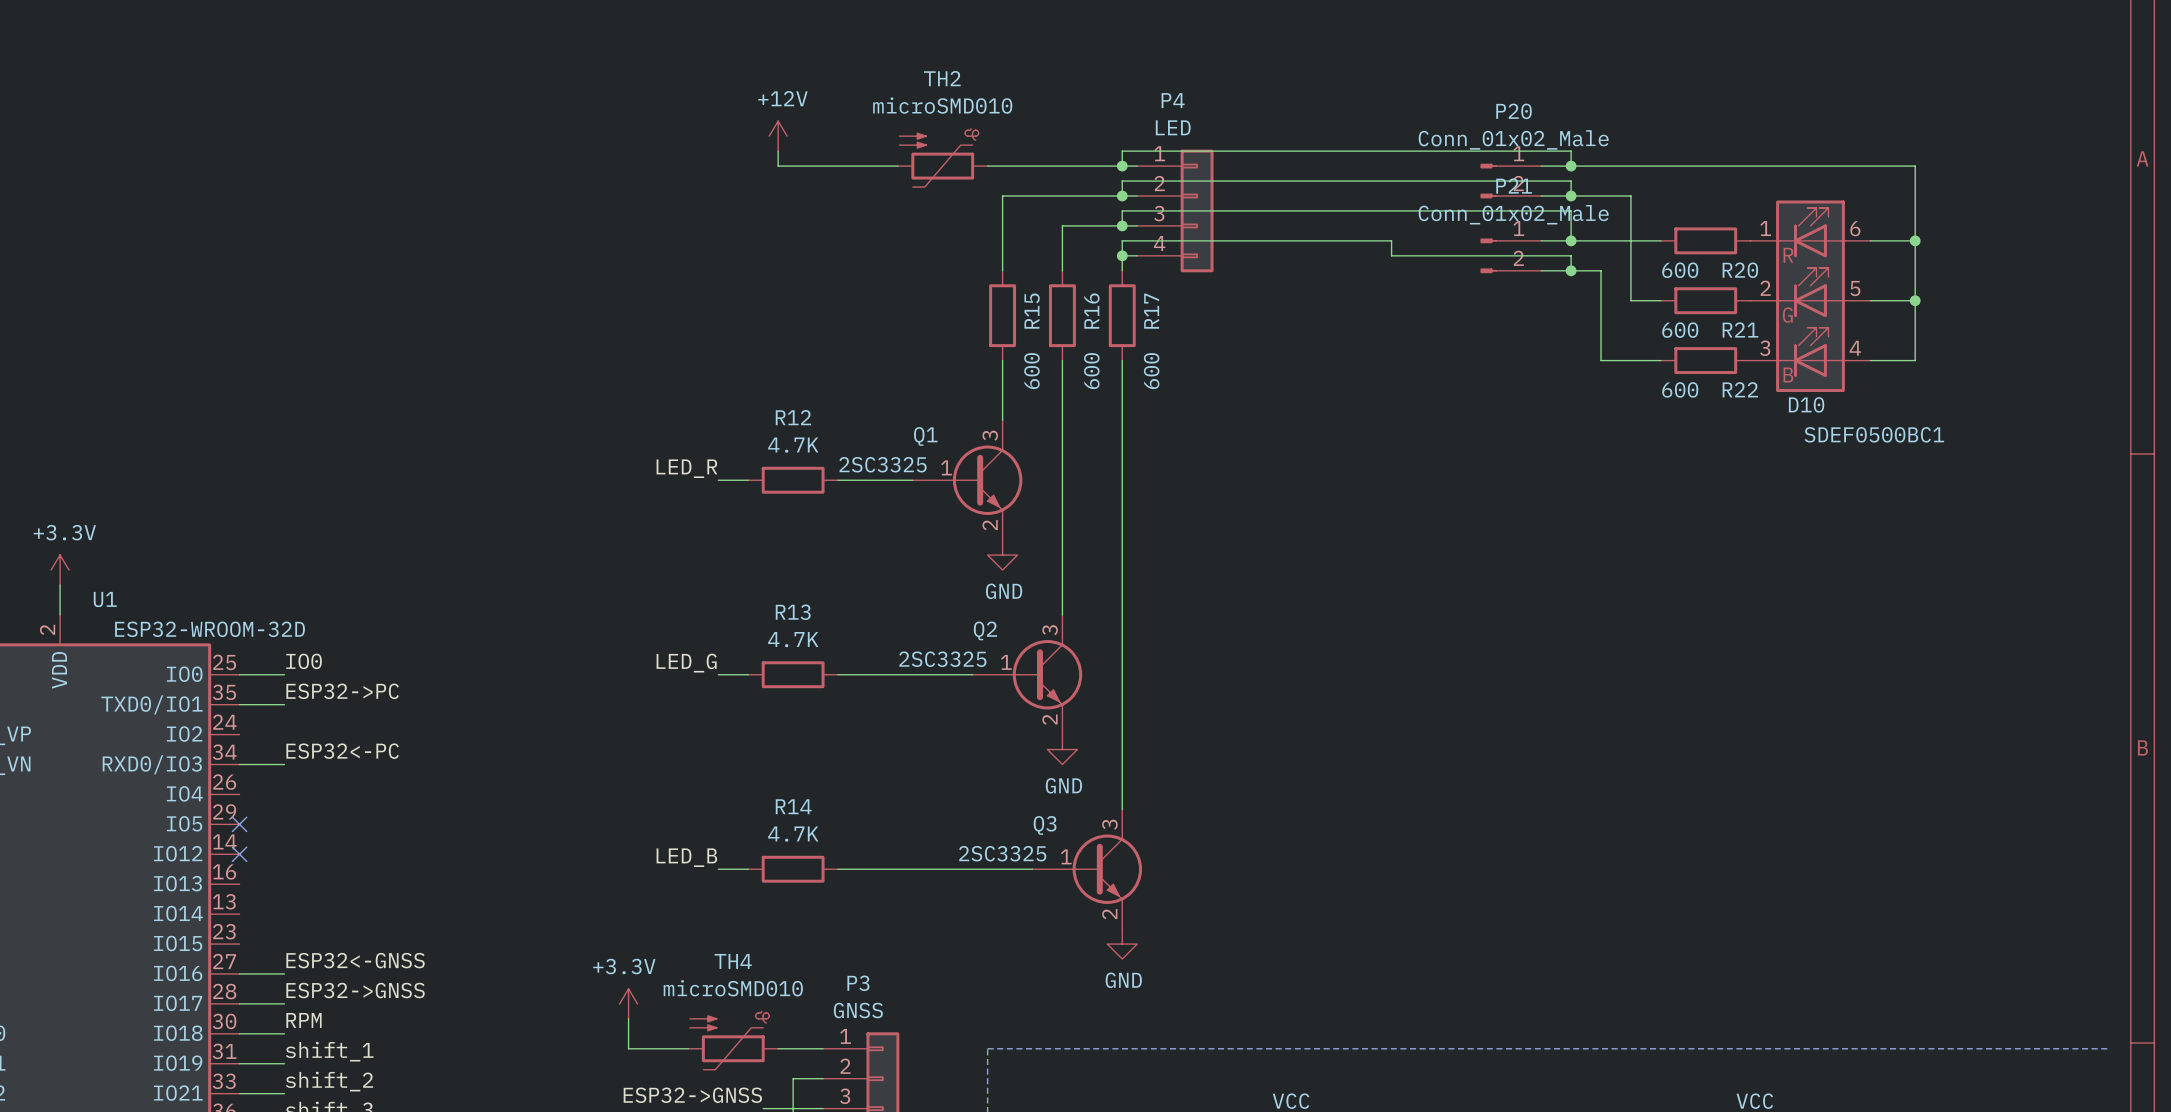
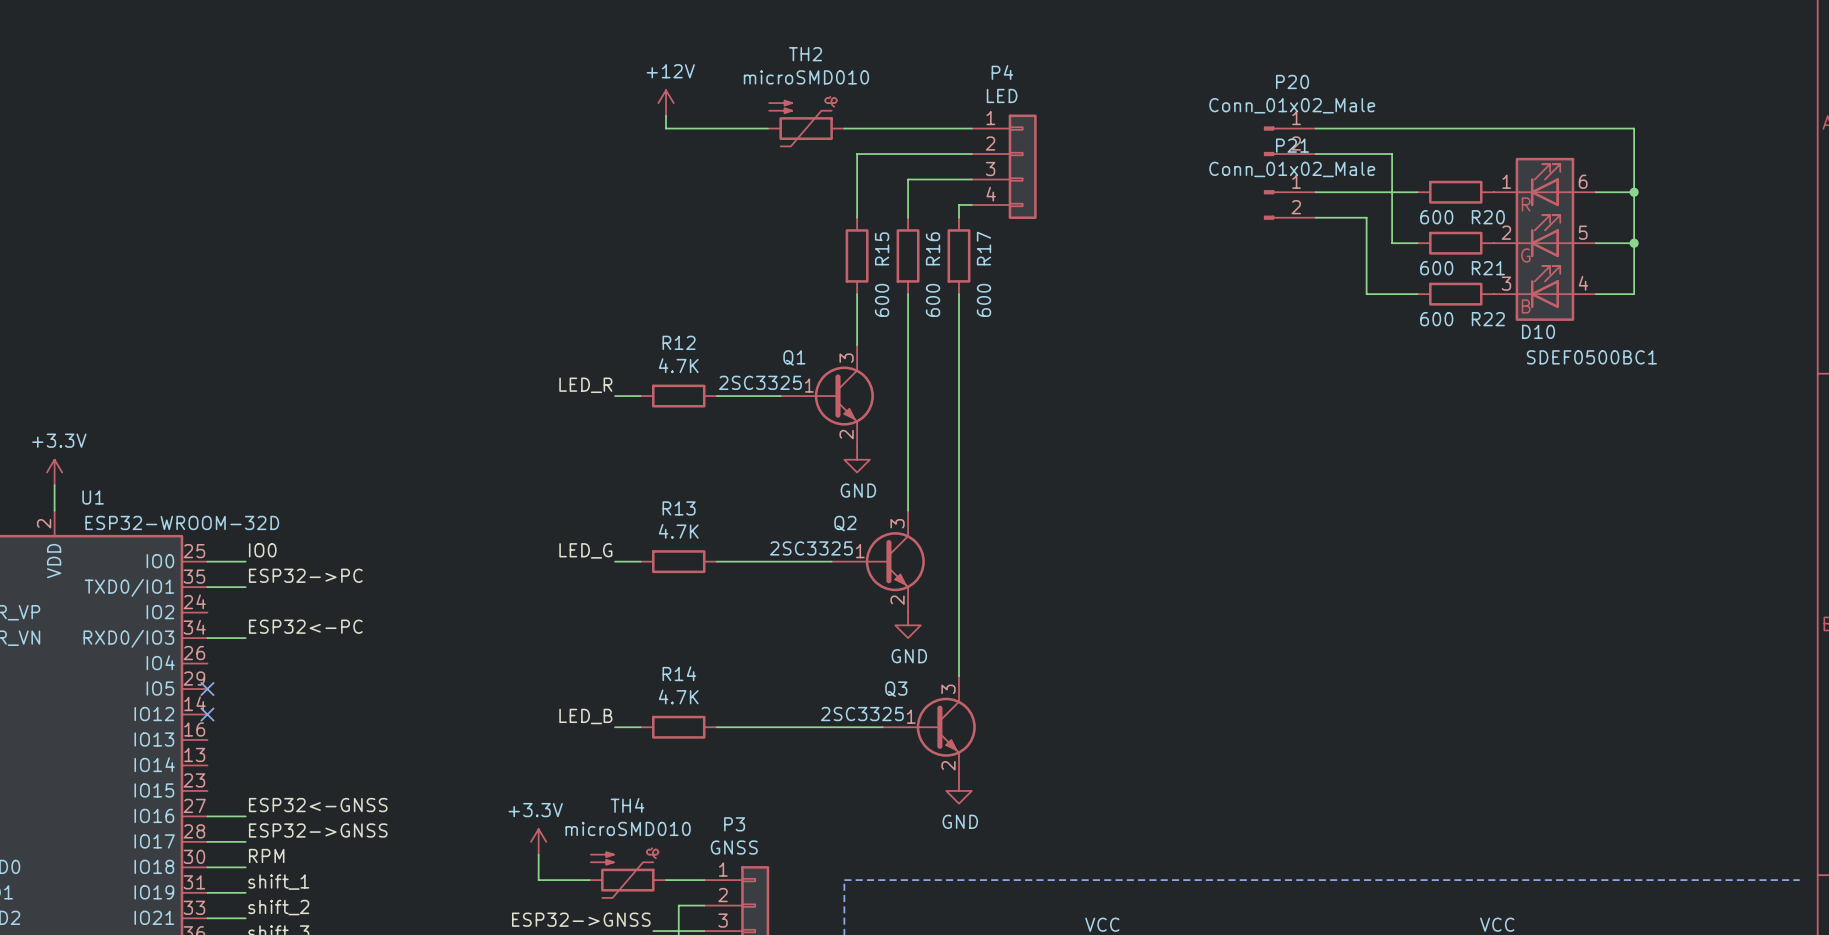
wire: (1122, 166) (1122, 151) (1571, 151) (1571, 166) -> none
junction: (1122, 166) -> none
junction: (1571, 166) -> none
wire: (1122, 196) (1122, 181) (1571, 181) (1571, 196) -> none
junction: (1122, 196) -> none
junction: (1571, 196) -> none
wire: (1122, 225) (1122, 210) (1571, 210) (1571, 240) -> none
junction: (1122, 225) -> none
junction: (1571, 240) -> none
wire: (1122, 255) (1122, 240) (1391, 240) (1391, 255) (1571, 255) (1571, 270) -> none
junction: (1122, 255) -> none
junction: (1571, 270) -> none

